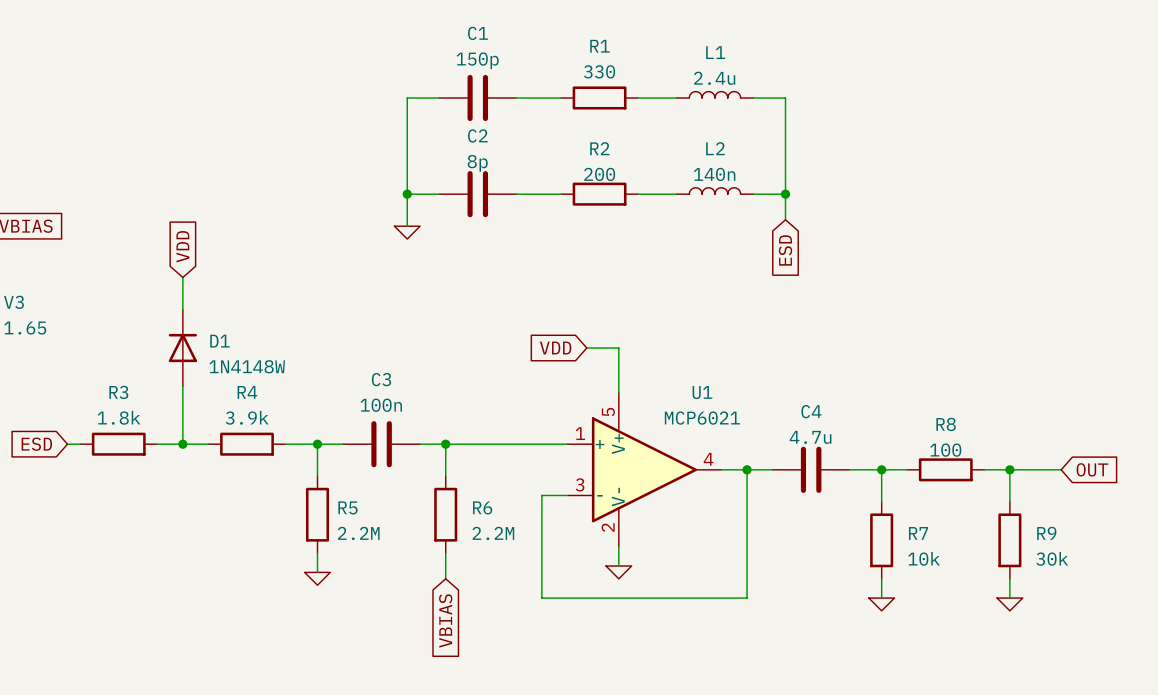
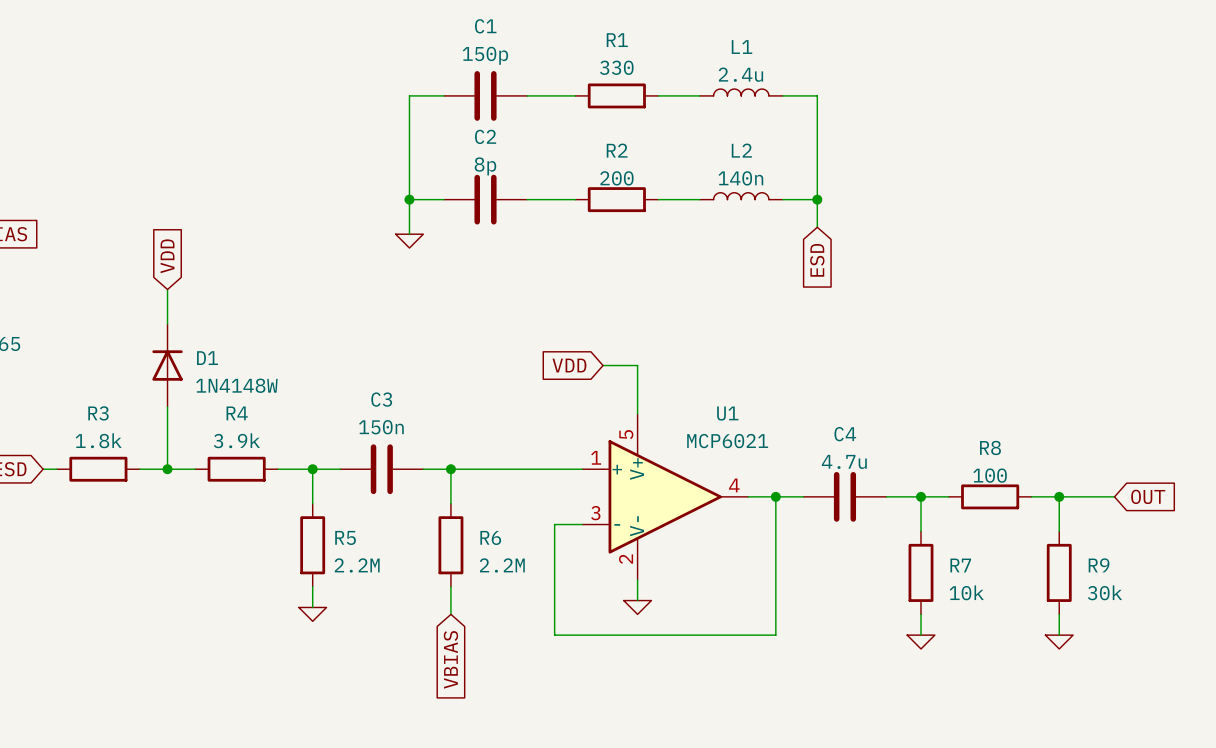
C3 value: 100n (381, 405) -> 150n (381, 427)

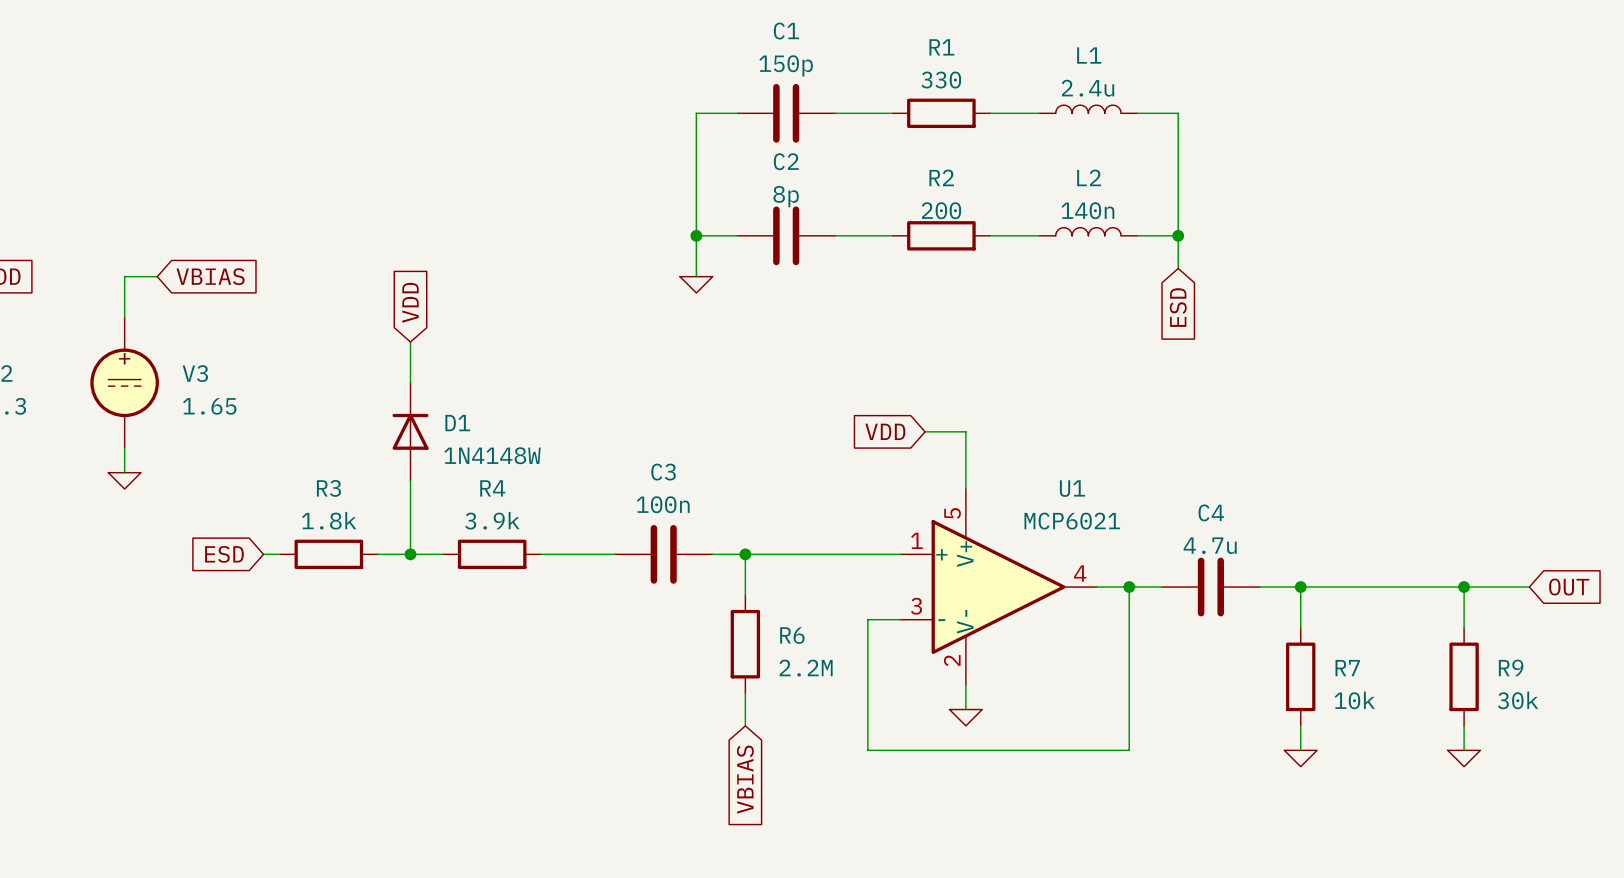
C3 value: 150n (381, 427) -> 100n (663, 504)
wire: (312, 469) (312, 503) -> none
junction: (312, 469) -> none
wire: none -> (1333, 587) (1431, 587)
R8: 100 (990, 496) -> none
R5: 2.2M (312, 545) -> none
wire: (312, 586) (312, 607) -> none
power symbol: (312, 614) -> none

